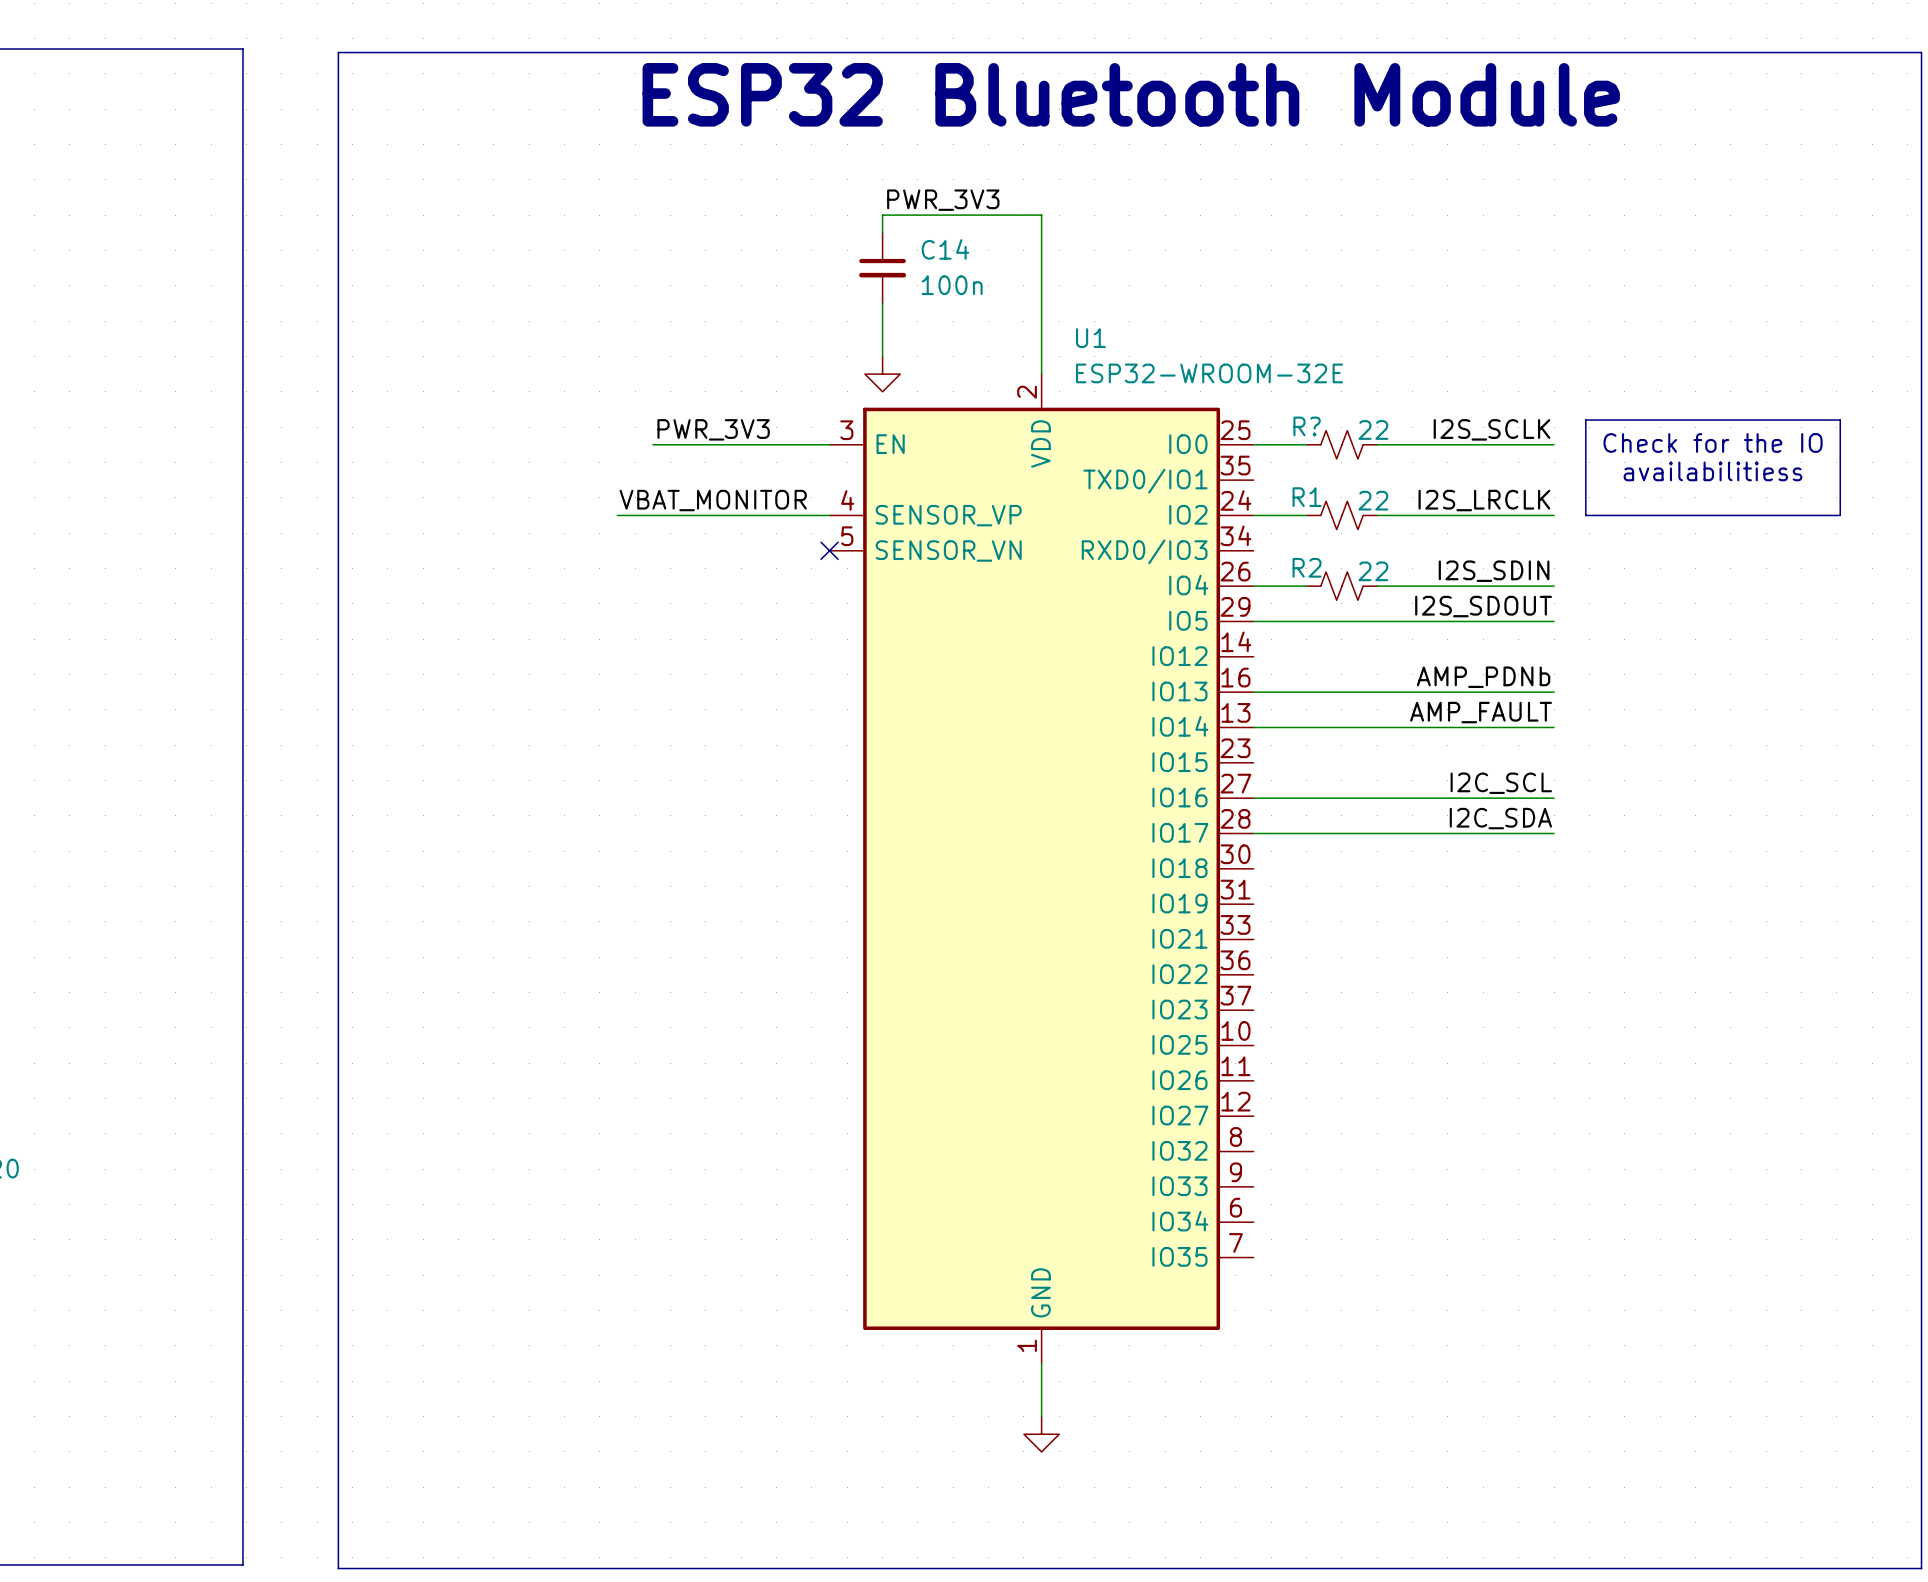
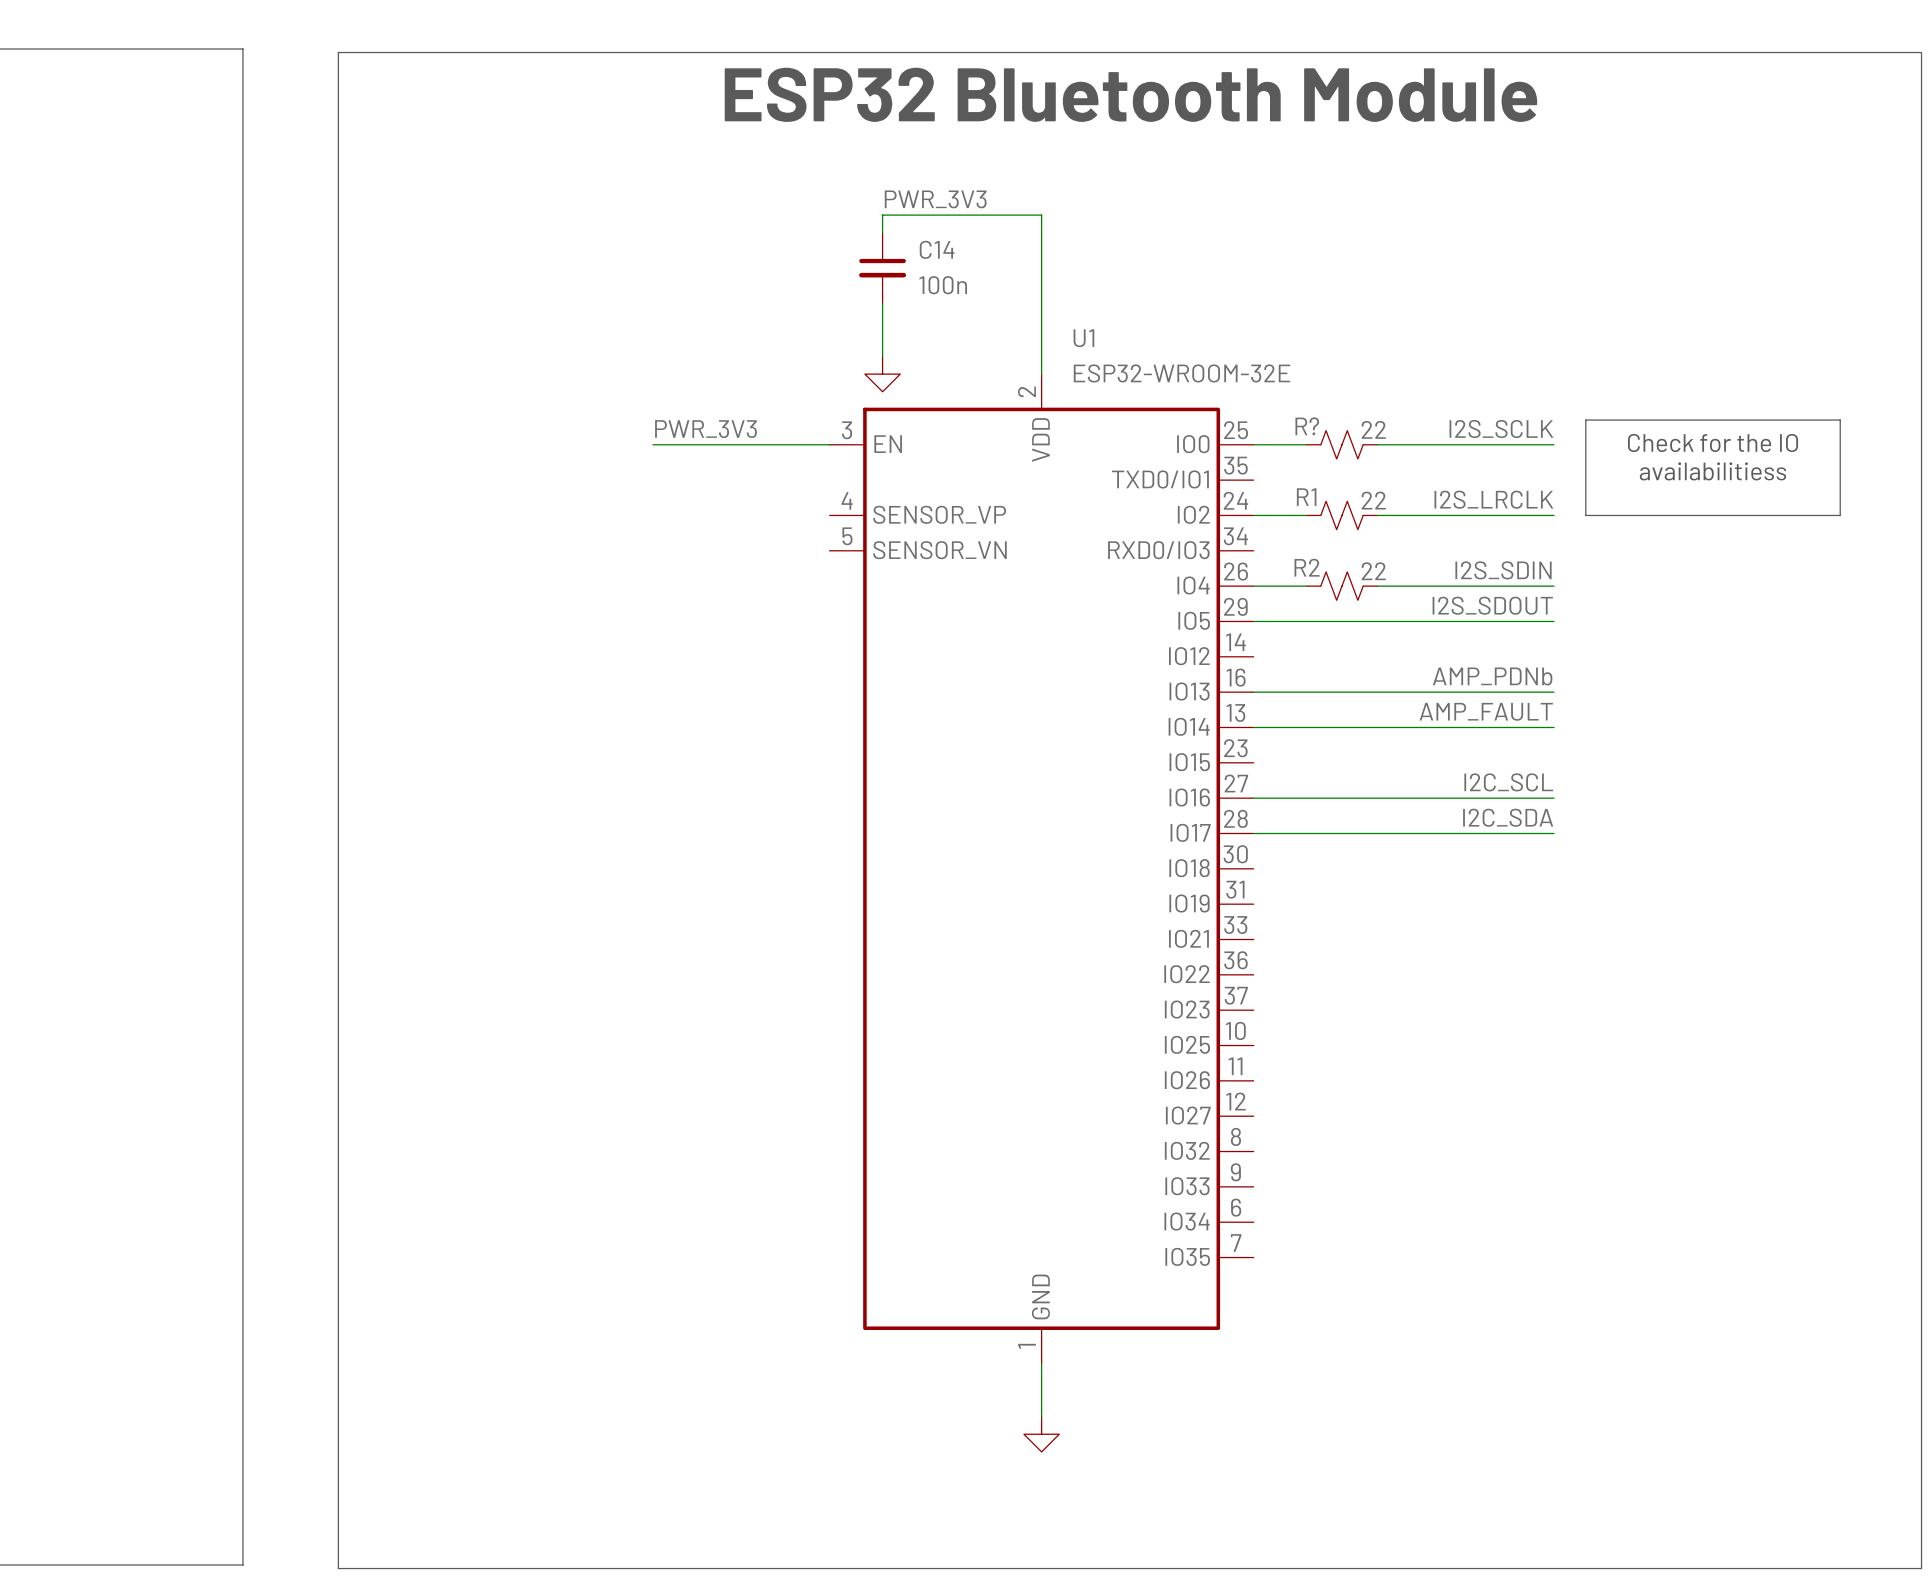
label: VBAT_MONITOR (713, 500) -> none
wire: (617, 515) (829, 515) -> none
no-connect mark: (829, 550) -> none

